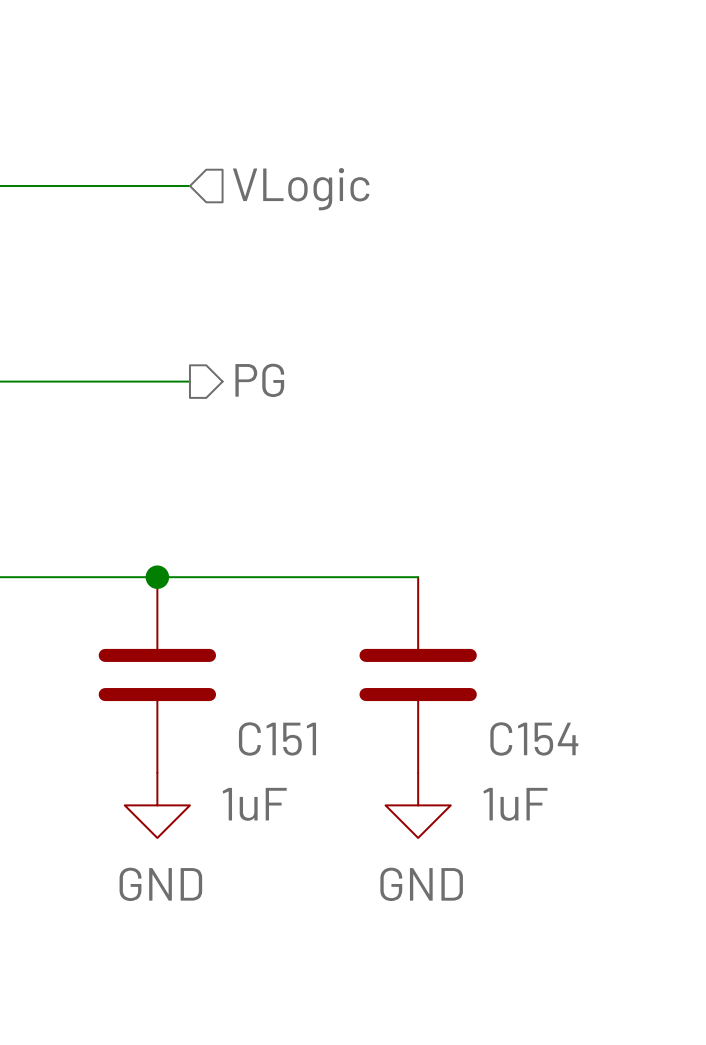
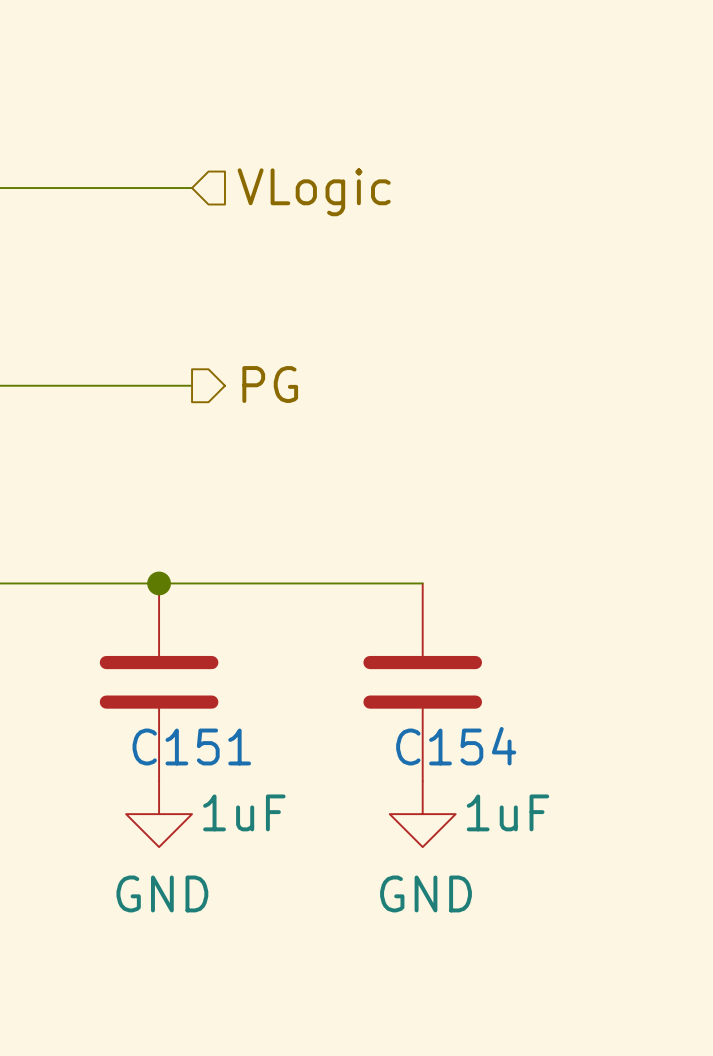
C151 name position: C151 (277, 738) -> C151 (191, 746)
C154 name position: C154 (534, 738) -> C154 (456, 746)

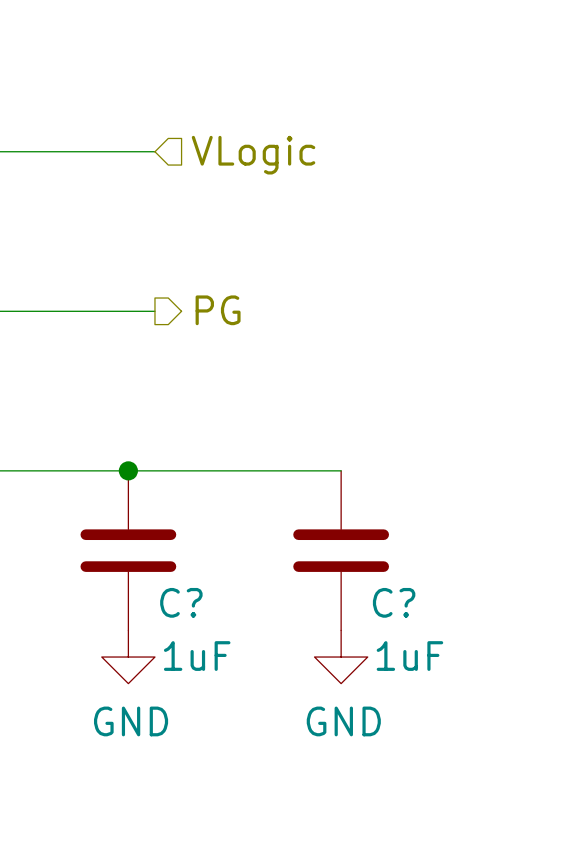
C151 name: C151 (191, 746) -> C? (181, 602)
C154 name: C154 (456, 746) -> C? (394, 602)

